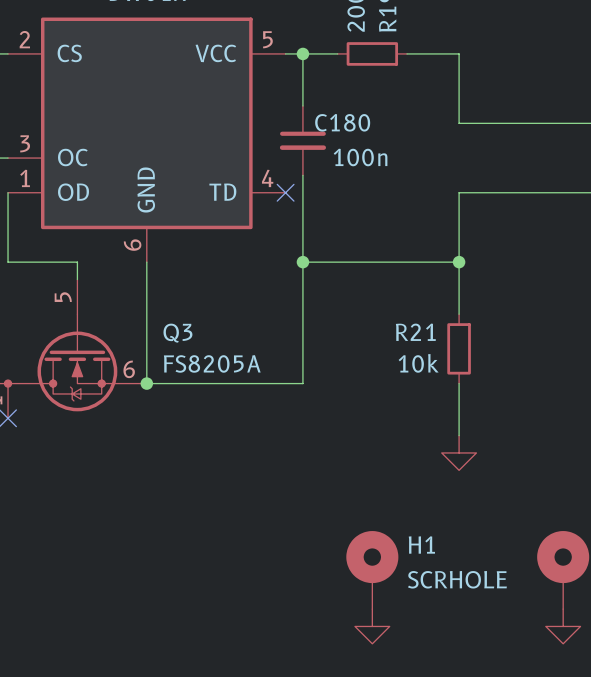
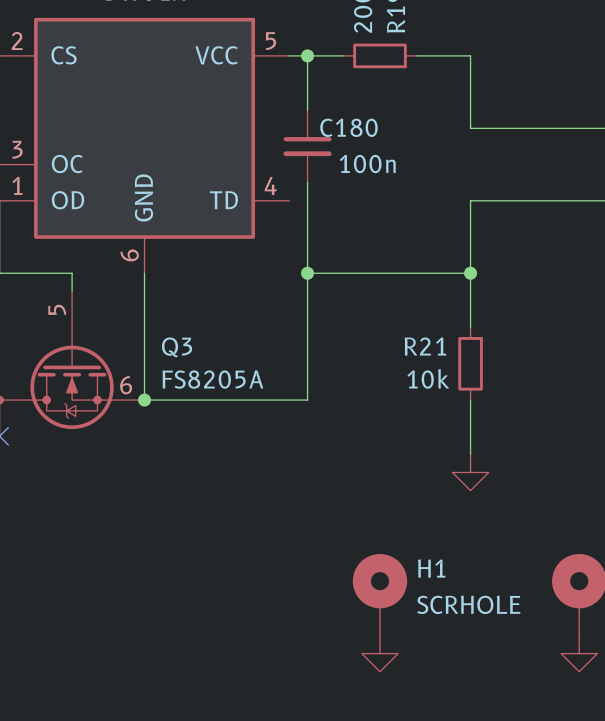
no-connect mark: (285, 192) -> none

